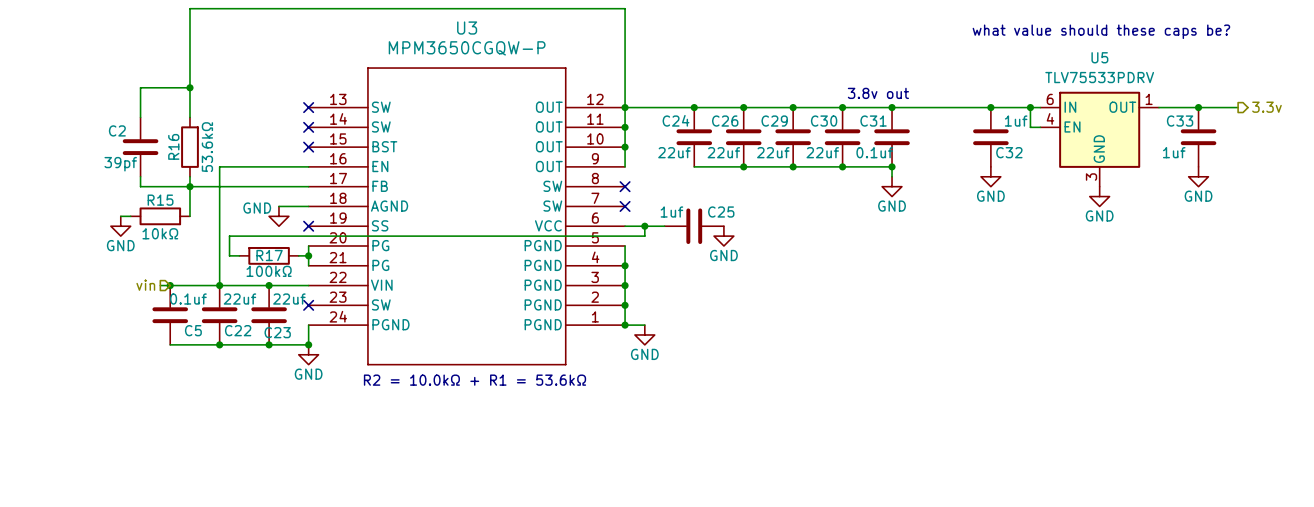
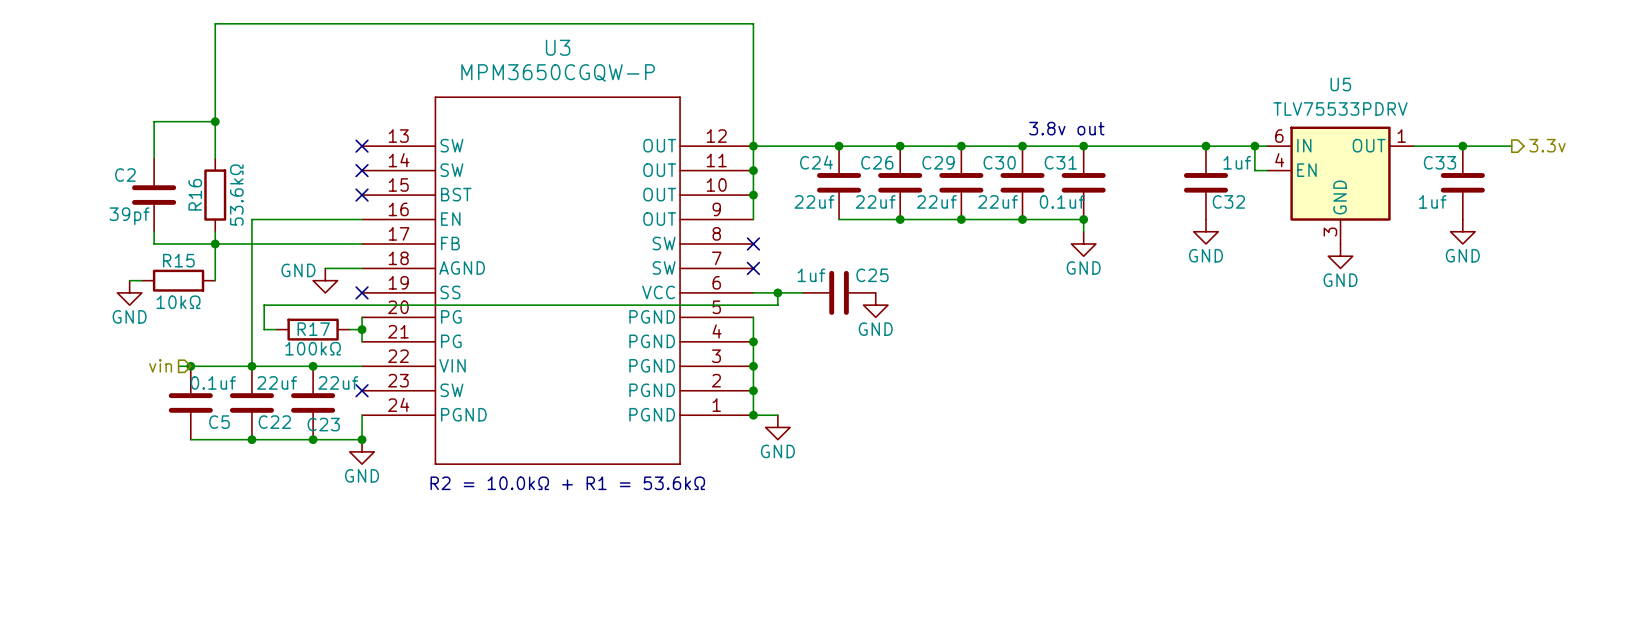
text: what value should these caps be? (1101, 31) -> none

